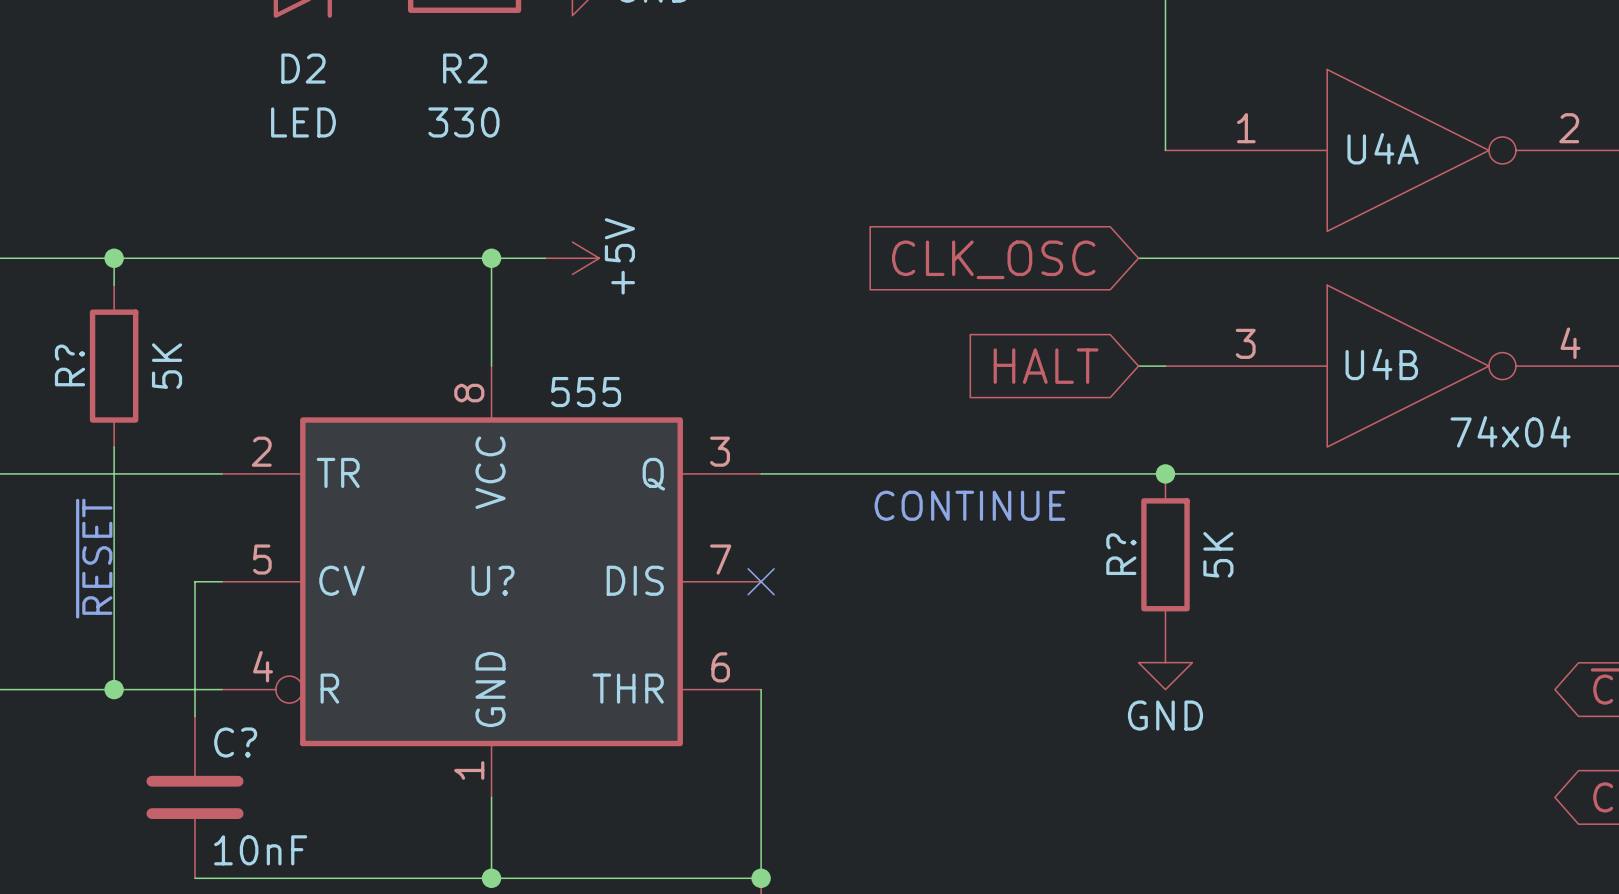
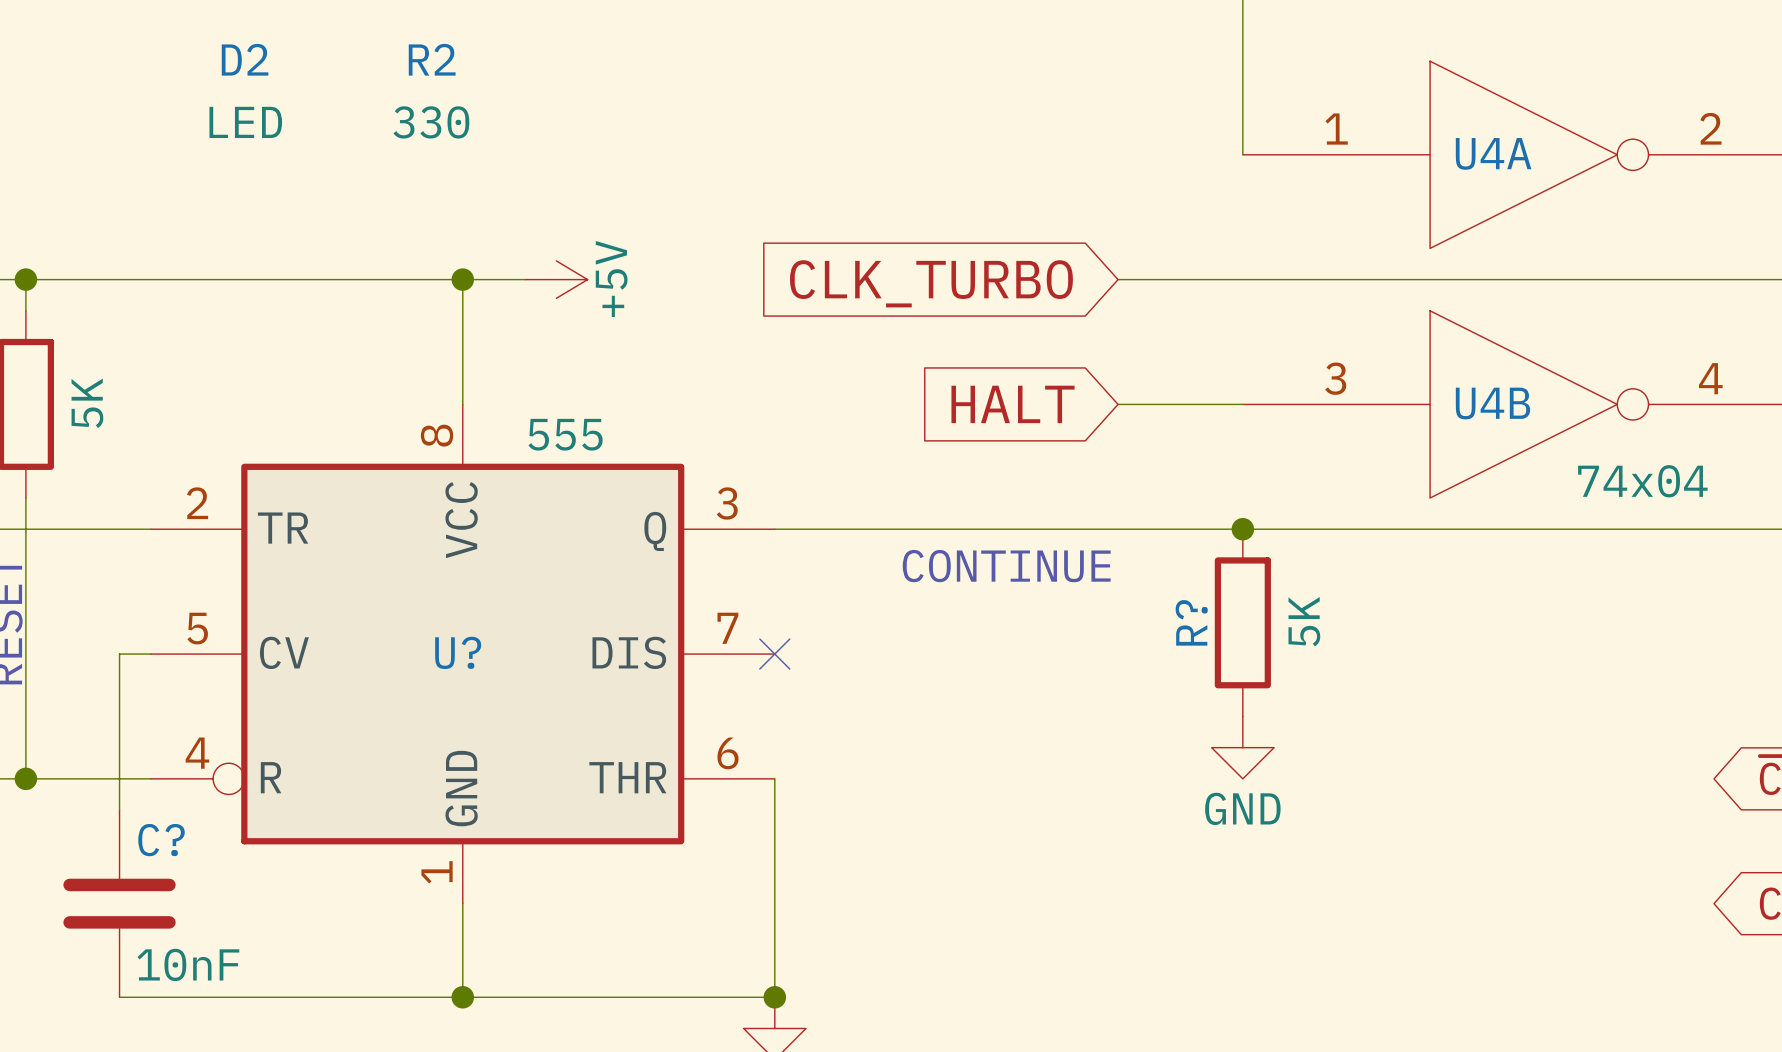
wire: none -> (1118, 279) (1211, 279)
global label: CLK_OSC (993, 259) -> CLK_TURBO (931, 283)
global label position: HALT (1046, 366) -> HALT (1013, 404)
wire: none -> (1118, 404) (1211, 404)

